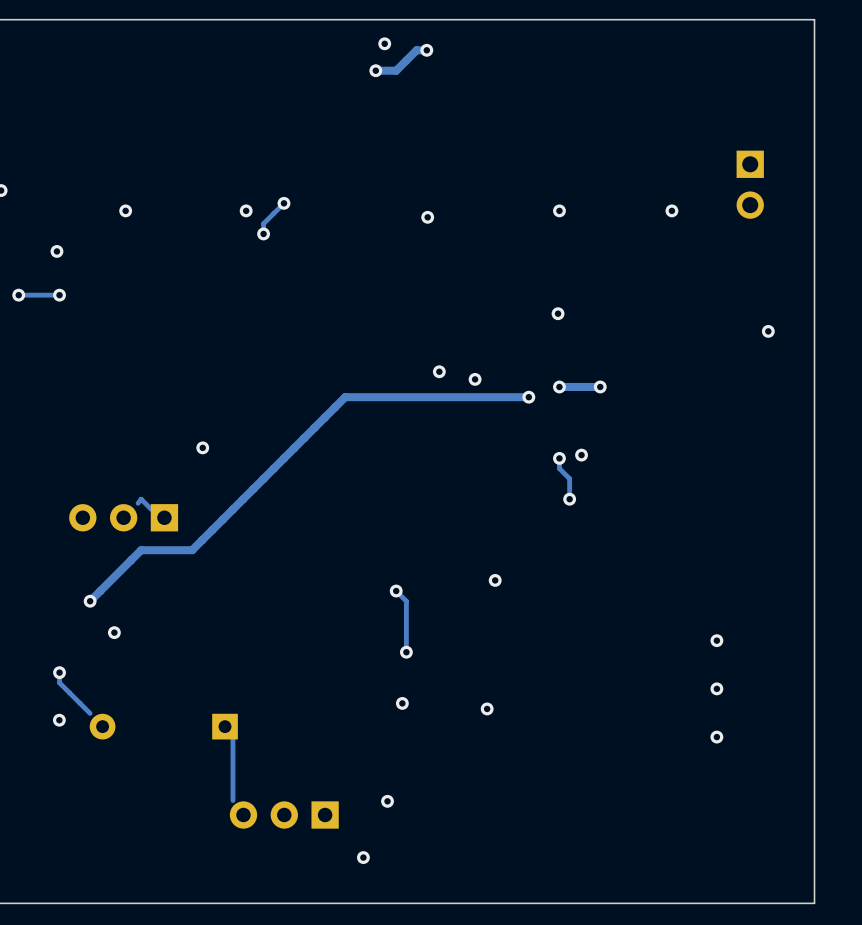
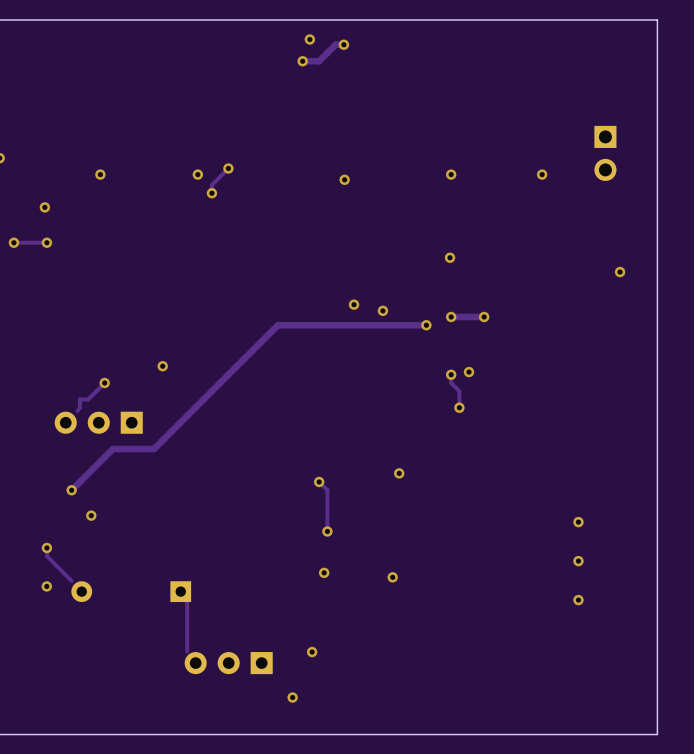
track: none -> (104, 382) (88, 399) (79, 399) (79, 407) (77, 411)
via: none -> (104, 382)
track: (138, 503) (141, 499) (151, 509) -> none

